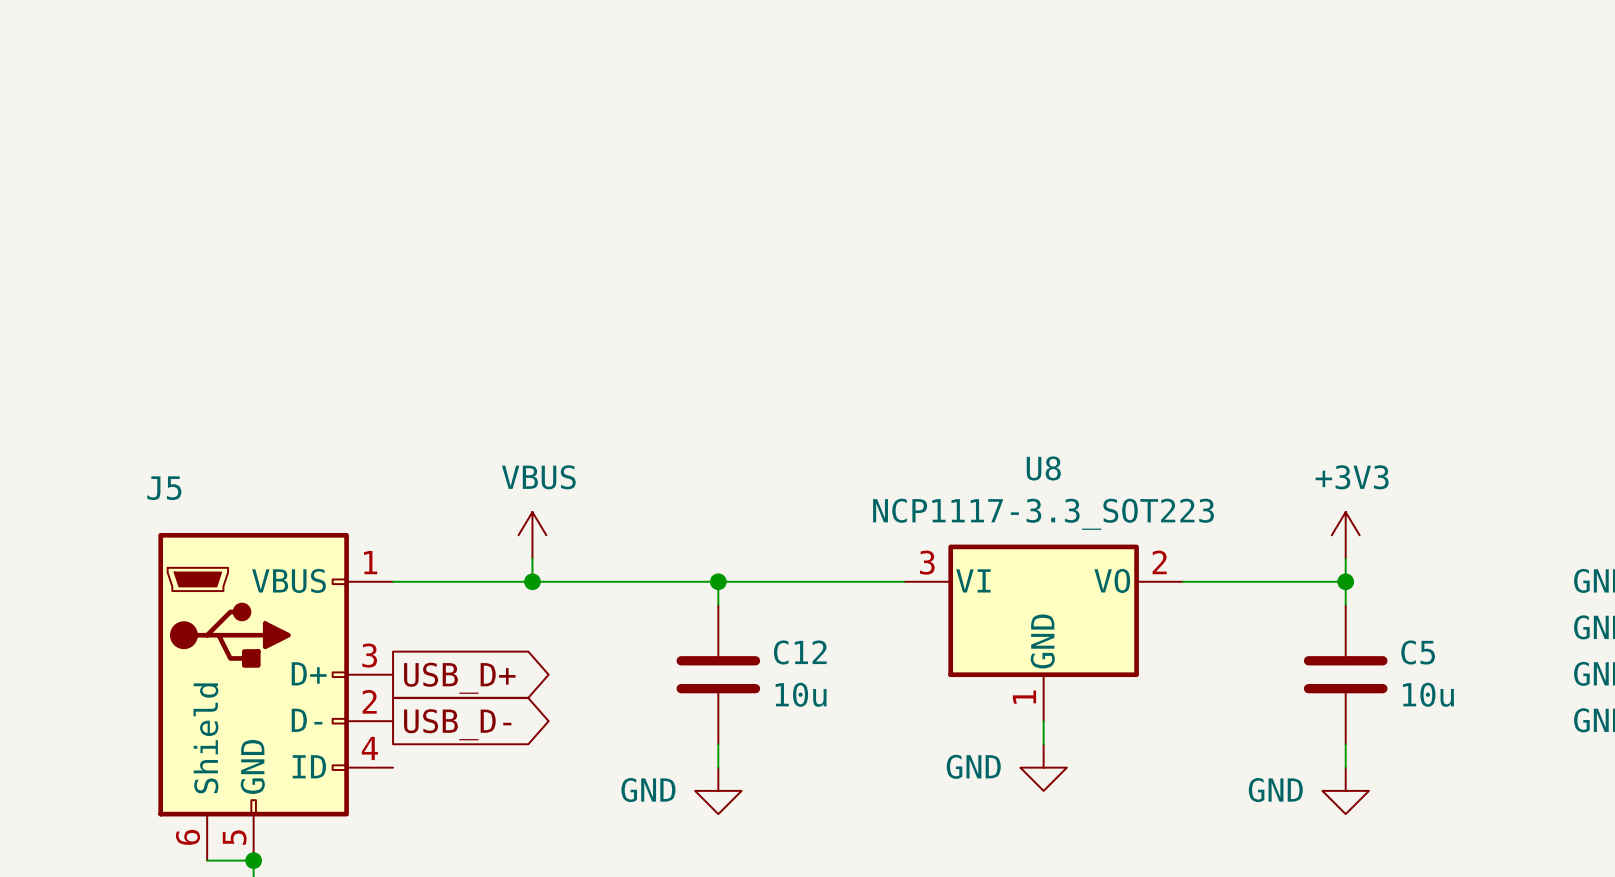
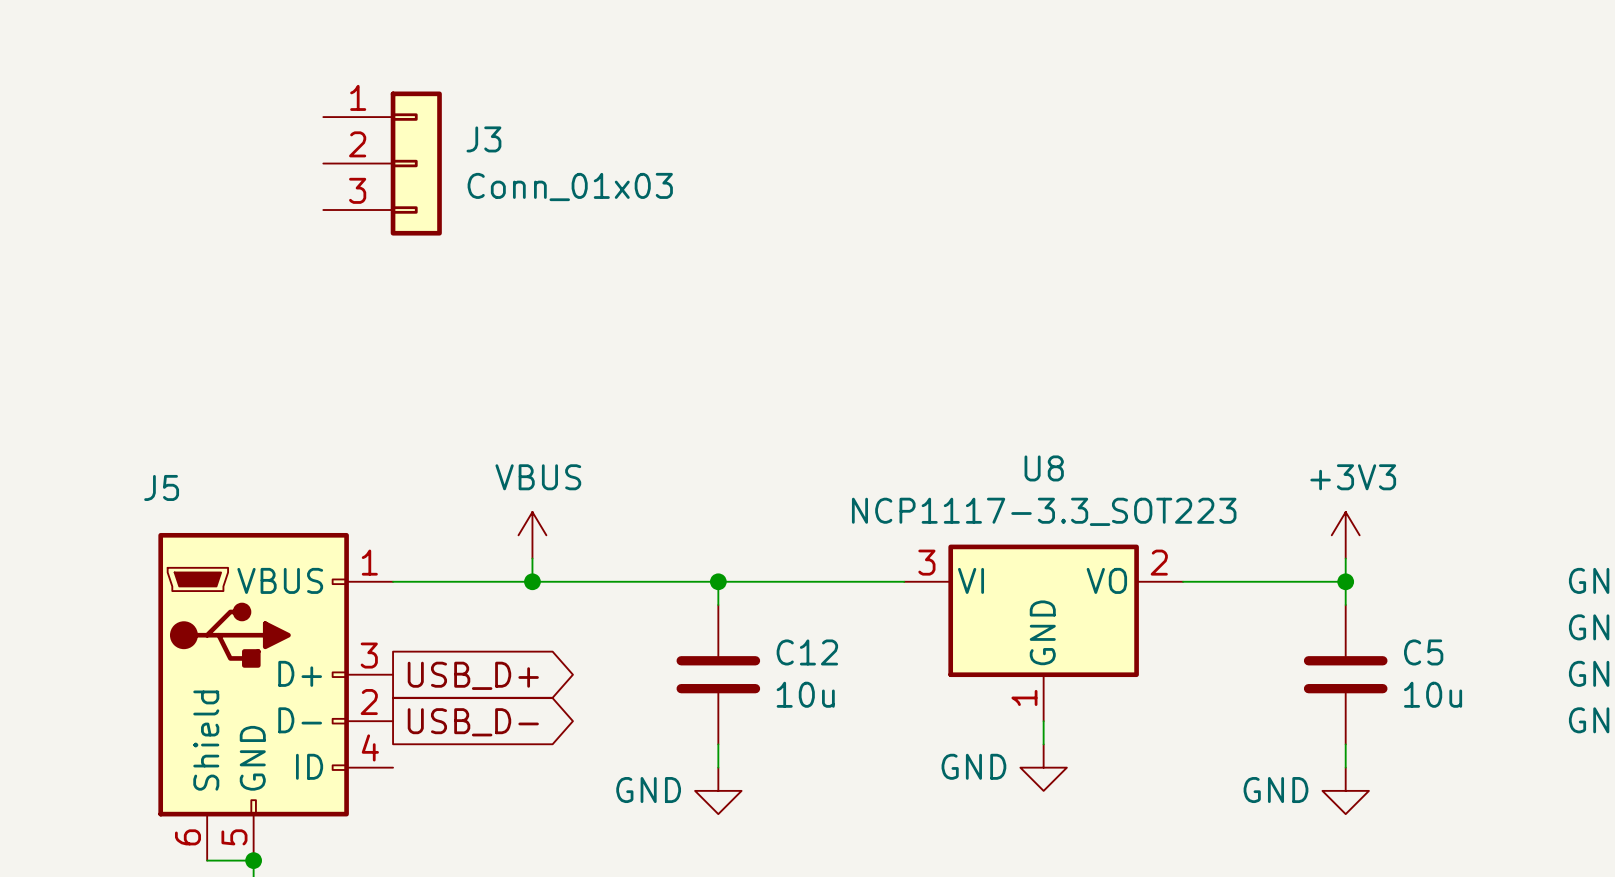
J3: none -> Conn_01x03 (382, 163)

